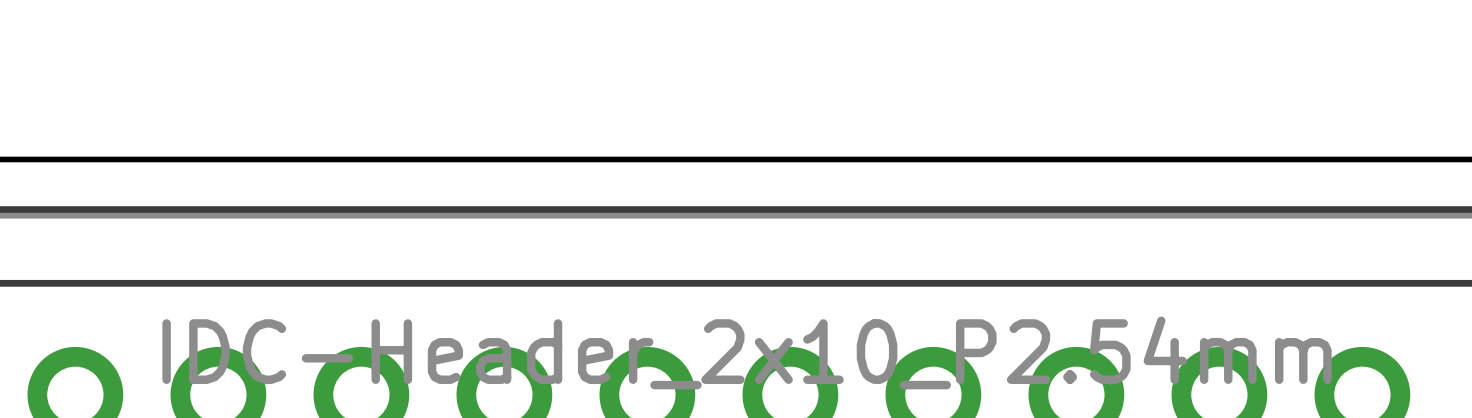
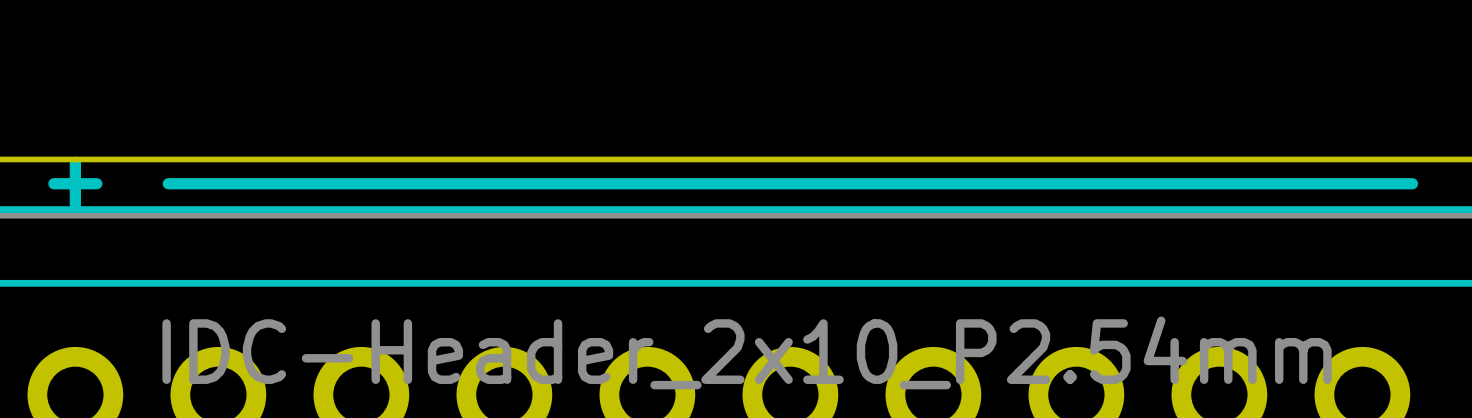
line: none -> (75, 162) (75, 205)
line: none -> (53, 183) (96, 183)
line: none -> (168, 183) (1412, 183)

